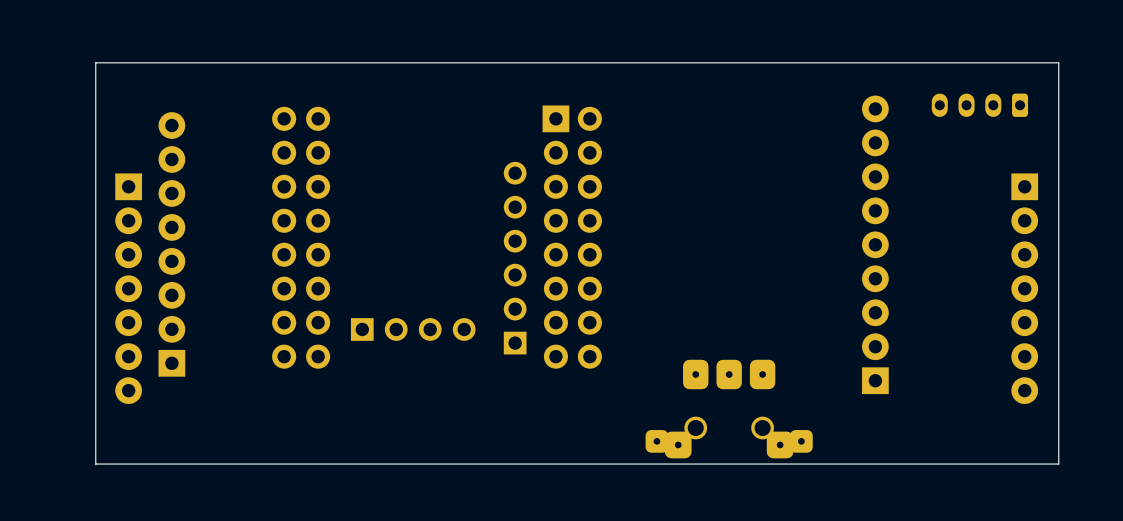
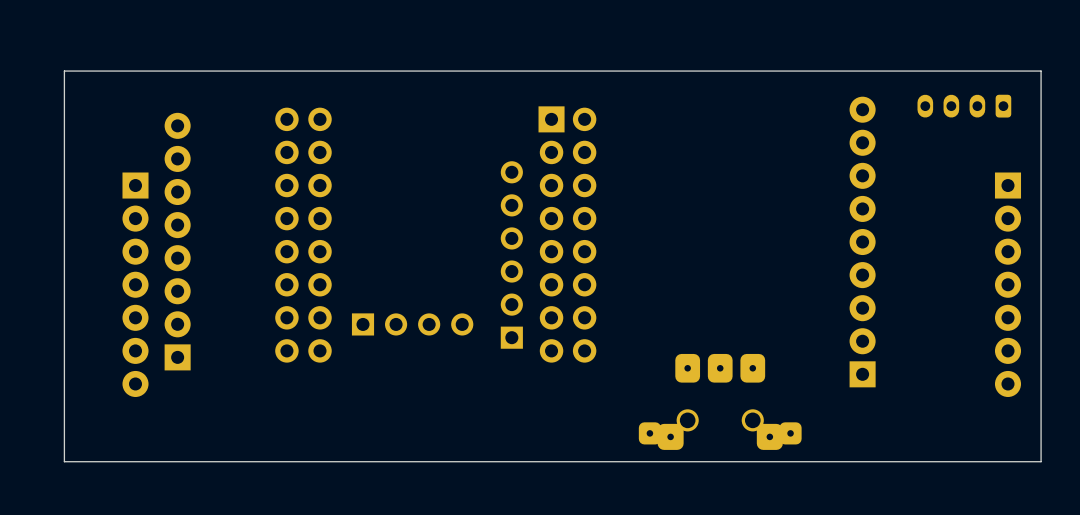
board edge: (1058, 69) (1058, 62) (95, 62) (95, 464) (1058, 464) -> (1041, 71) (64, 71) (64, 461) (1041, 461) (1041, 455)

